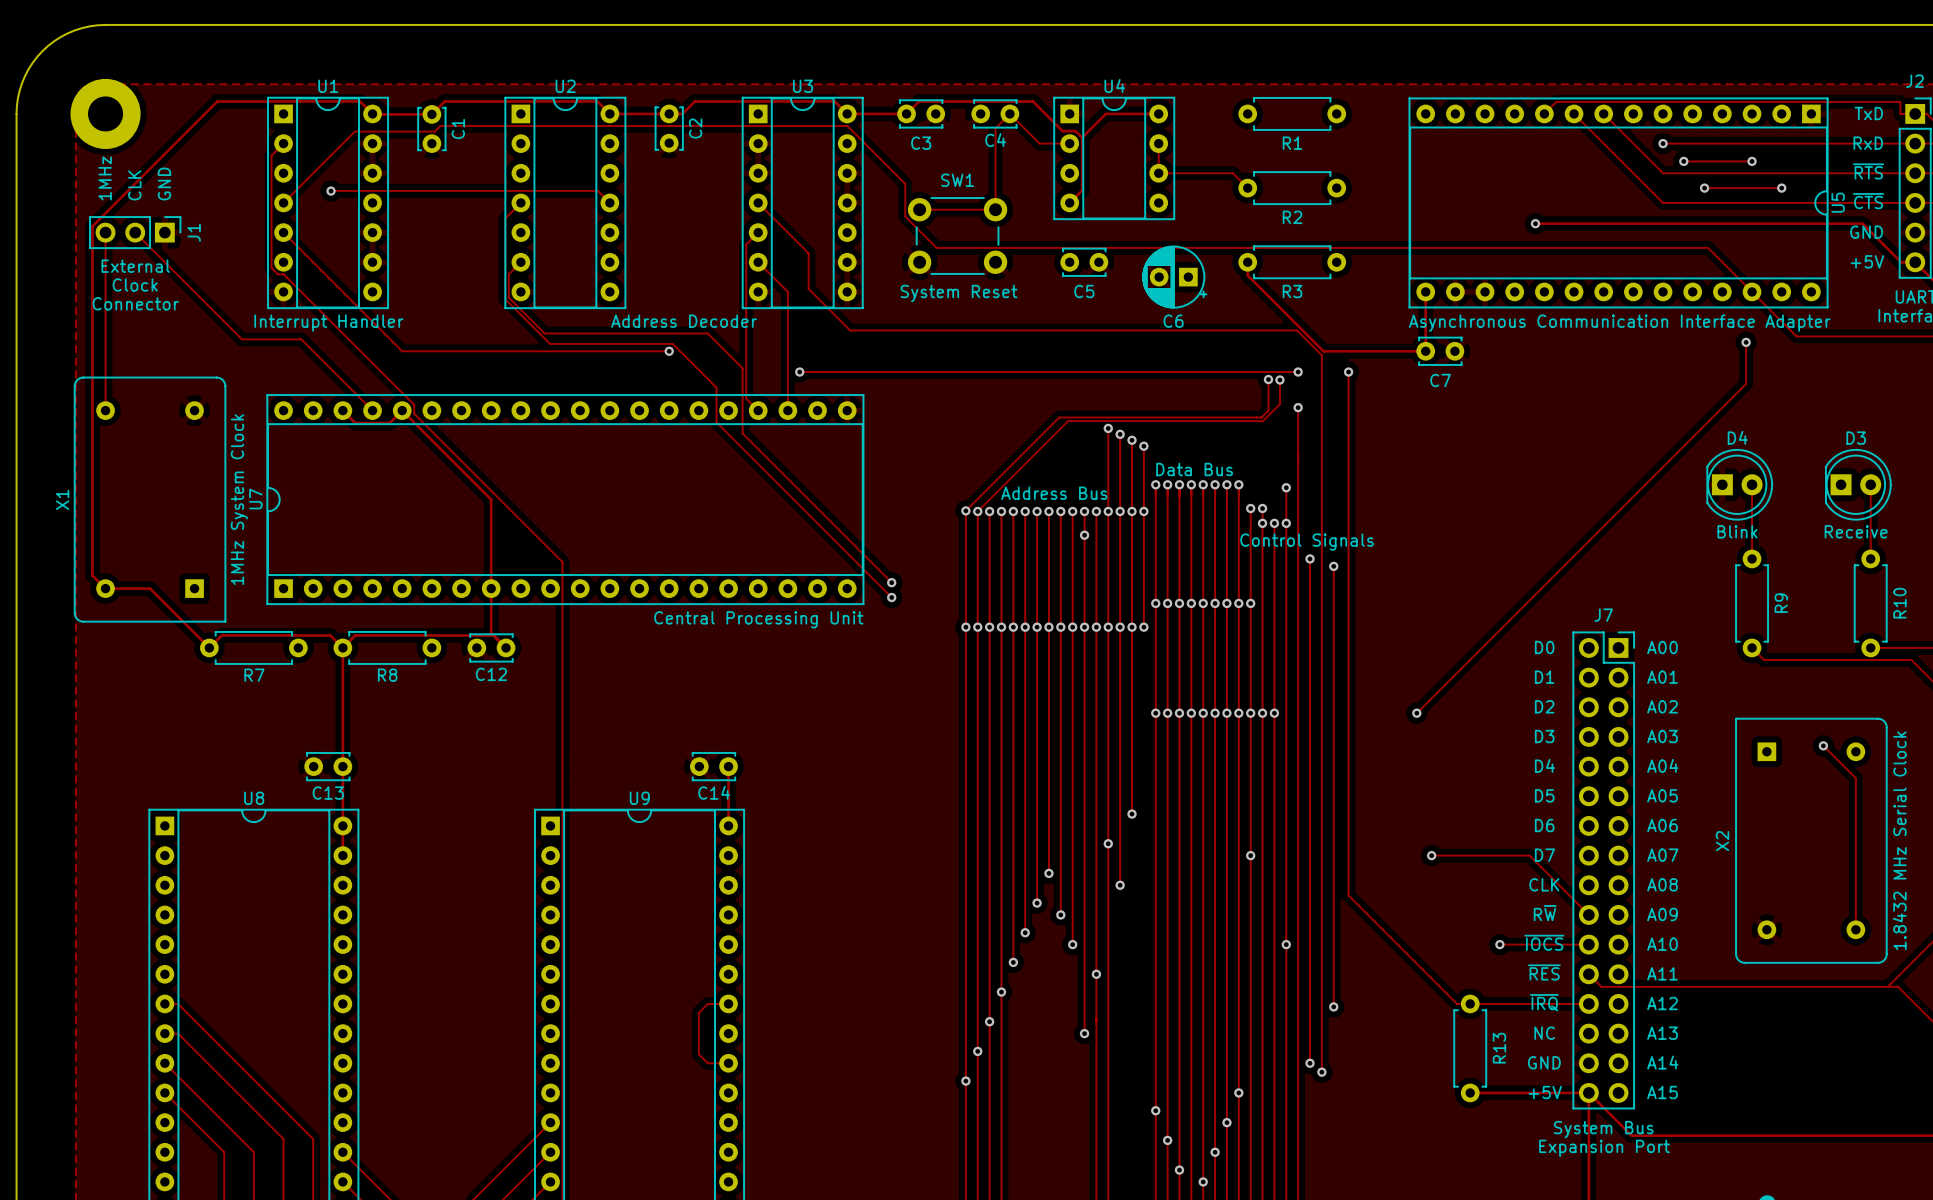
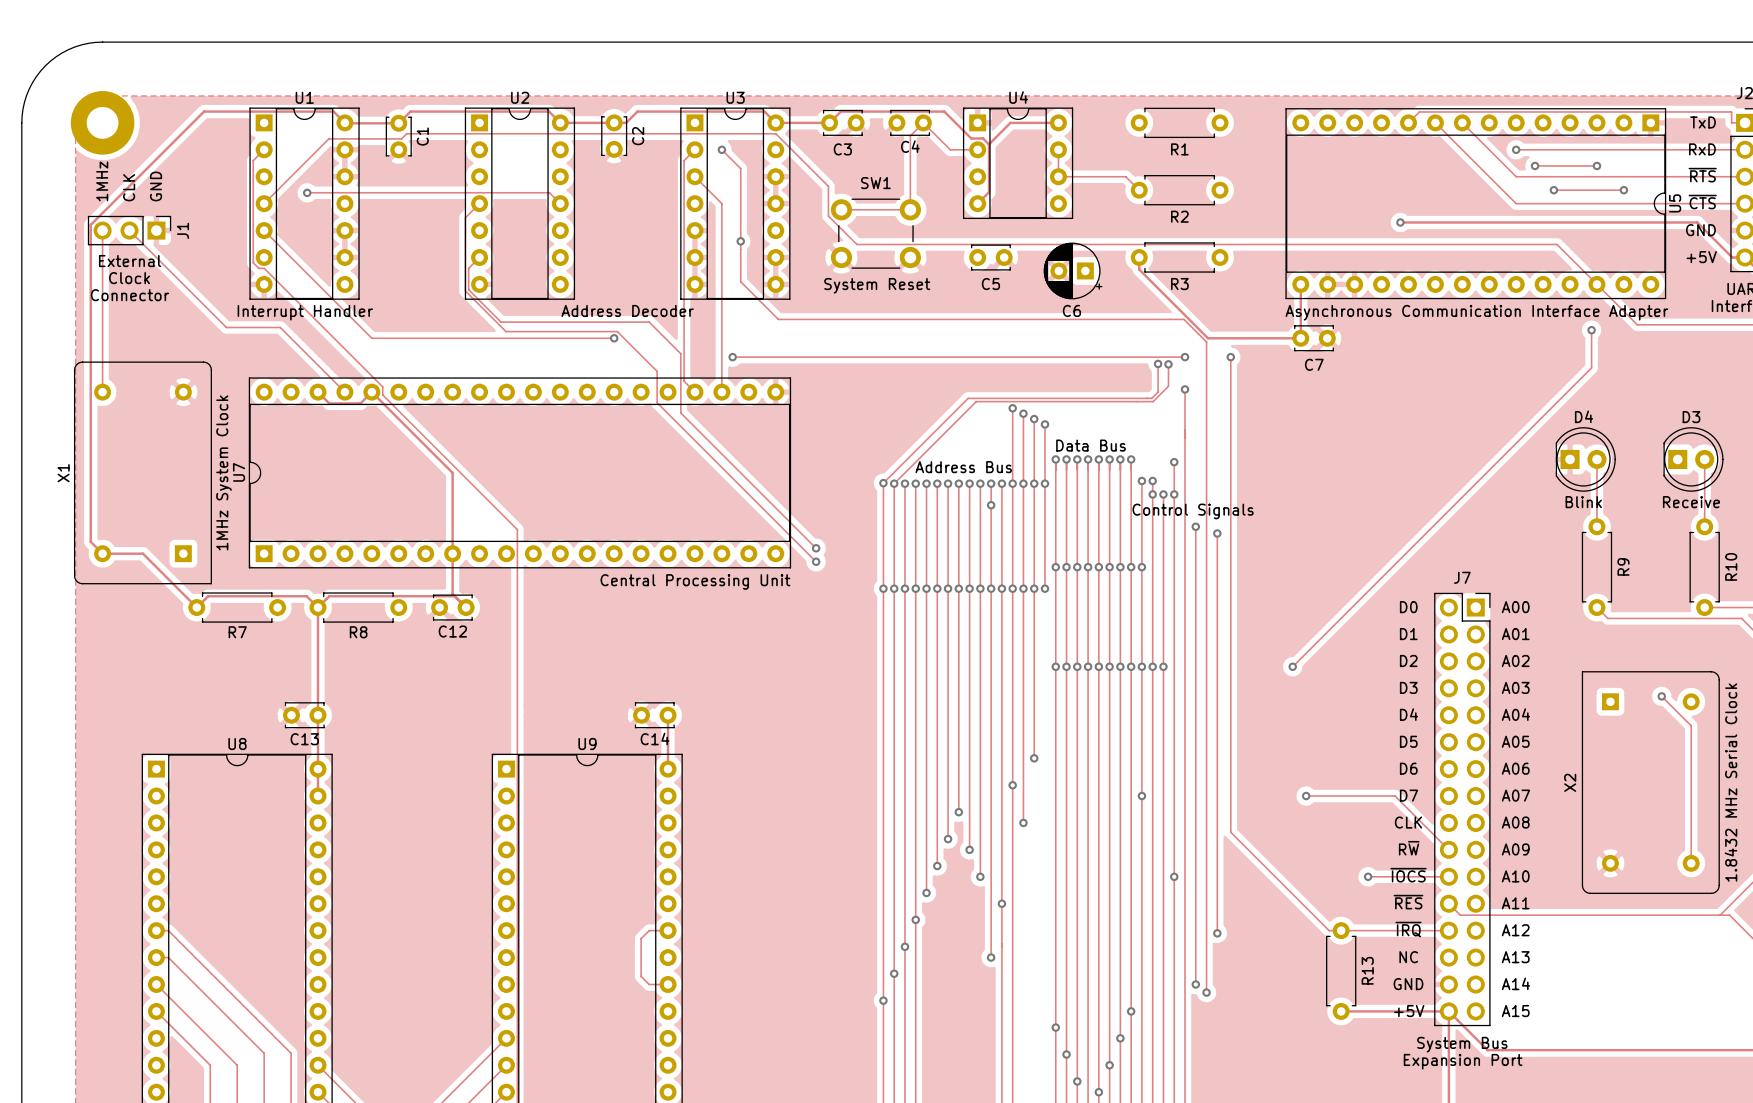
via: none -> (721, 149)
track: (758, 202) (808, 253) -> (721, 149) (740, 168) (740, 249)
track: (758, 232) (746, 244) -> (694, 149) (684, 160) (684, 241)
via: none -> (740, 241)
track: (758, 262) (787, 291) -> (694, 176) (721, 203) (721, 284)

